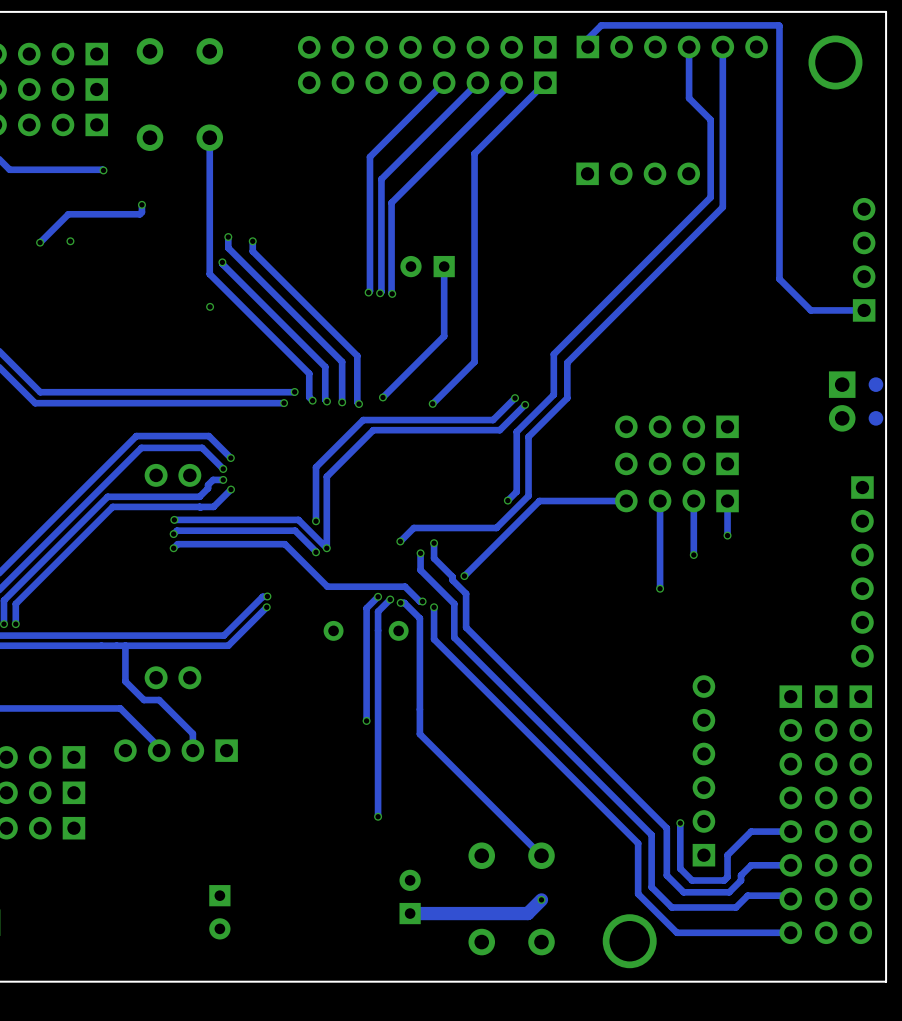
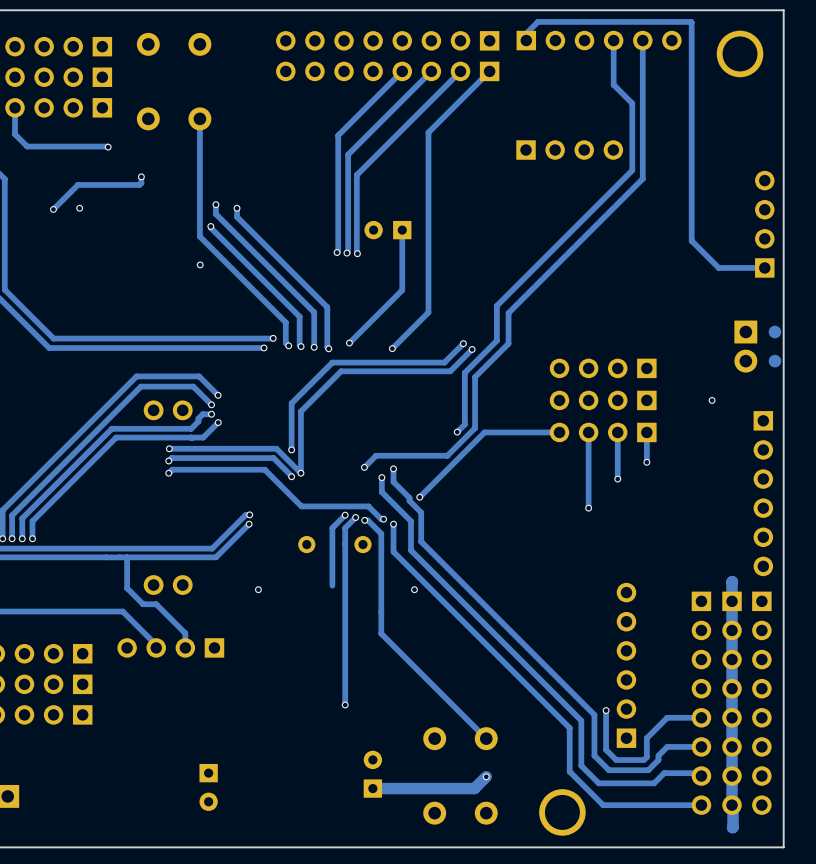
via: none -> (712, 400)
track: (366, 608) (366, 720) -> (335, 525) (332, 527) (332, 585)
track: none -> (732, 581) (732, 827)
via: none -> (258, 589)
via: none -> (414, 589)
via: (366, 720) -> none

